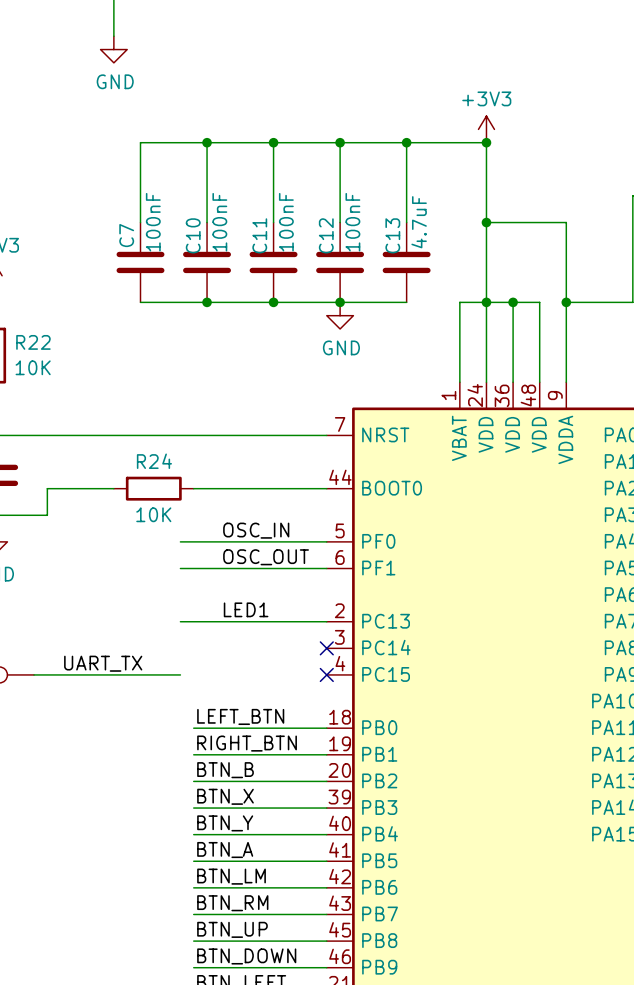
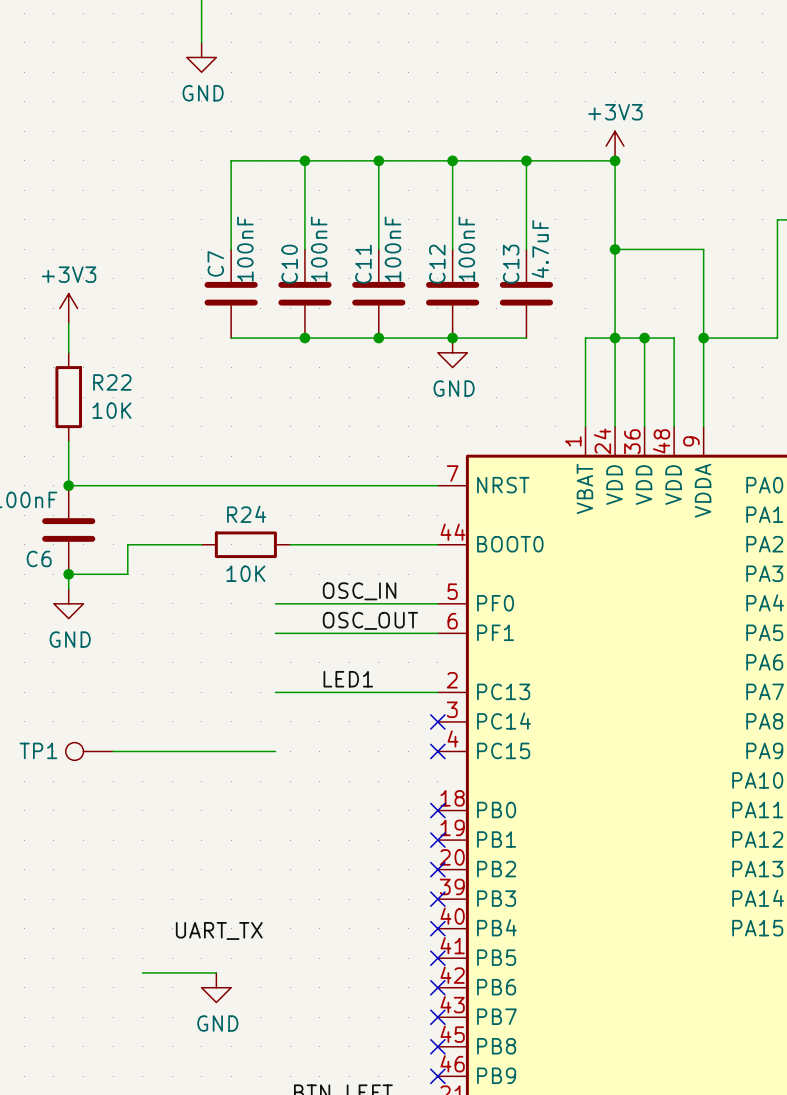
label position: UART_TX (103, 663) -> UART_TX (219, 930)
label: LEFT_BTN (240, 716) -> none
wire: (193, 728) (326, 728) -> none
no-connect mark: none -> (437, 810)
label: RIGHT_BTN (247, 743) -> none
wire: (193, 754) (326, 754) -> none
no-connect mark: none -> (437, 840)
label: BTN_B (225, 770) -> none
wire: (193, 781) (326, 781) -> none
no-connect mark: none -> (437, 869)
label: BTN_X (225, 796) -> none
wire: (193, 808) (326, 808) -> none
no-connect mark: none -> (437, 899)
label: BTN_Y (225, 823) -> none
wire: (193, 834) (326, 834) -> none
no-connect mark: none -> (437, 928)
label: BTN_A (225, 850) -> none
wire: (193, 861) (326, 861) -> none
no-connect mark: none -> (437, 958)
wire: none -> (142, 972) (216, 972)
label: BTN_LM (231, 876) -> none
power symbol: none -> GND (216, 987)
wire: (193, 887) (326, 887) -> none
no-connect mark: none -> (437, 987)
label: BTN_RM (232, 903) -> none
wire: (193, 914) (326, 914) -> none
no-connect mark: none -> (437, 1017)
label: BTN_UP (232, 929) -> none
wire: (193, 941) (326, 941) -> none
no-connect mark: none -> (437, 1046)
label: BTN_DOWN (246, 956) -> none
wire: (193, 967) (326, 967) -> none
no-connect mark: none -> (437, 1076)

